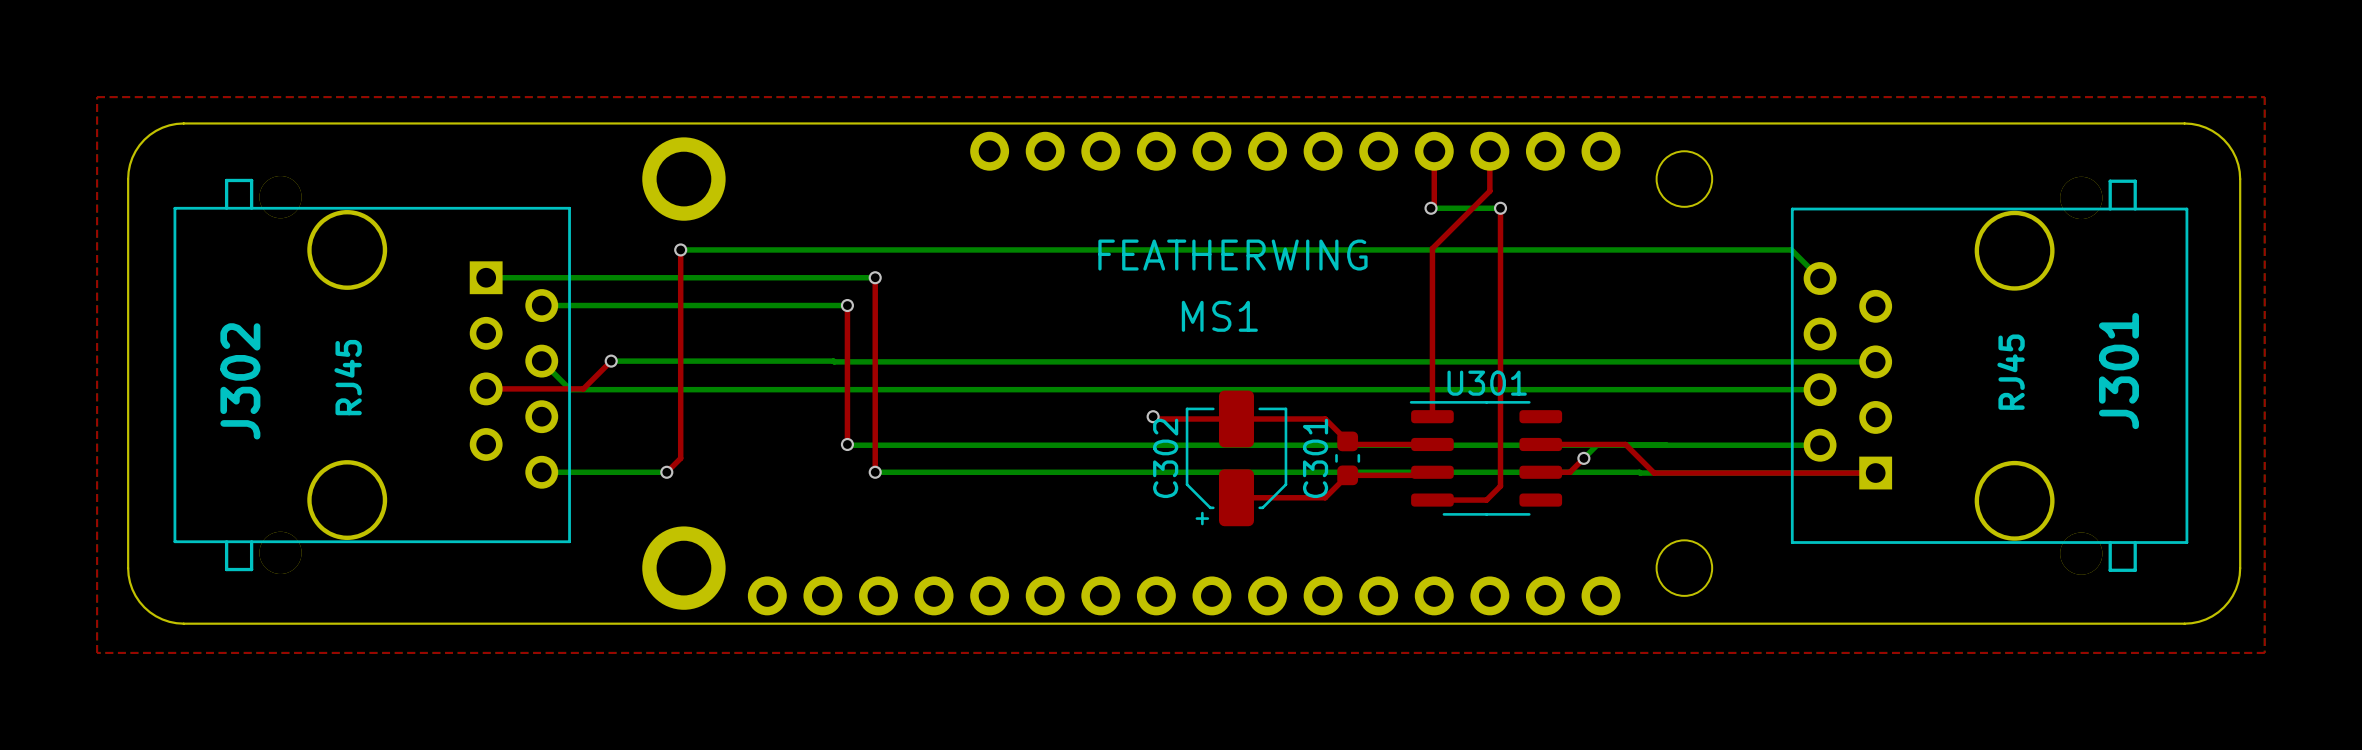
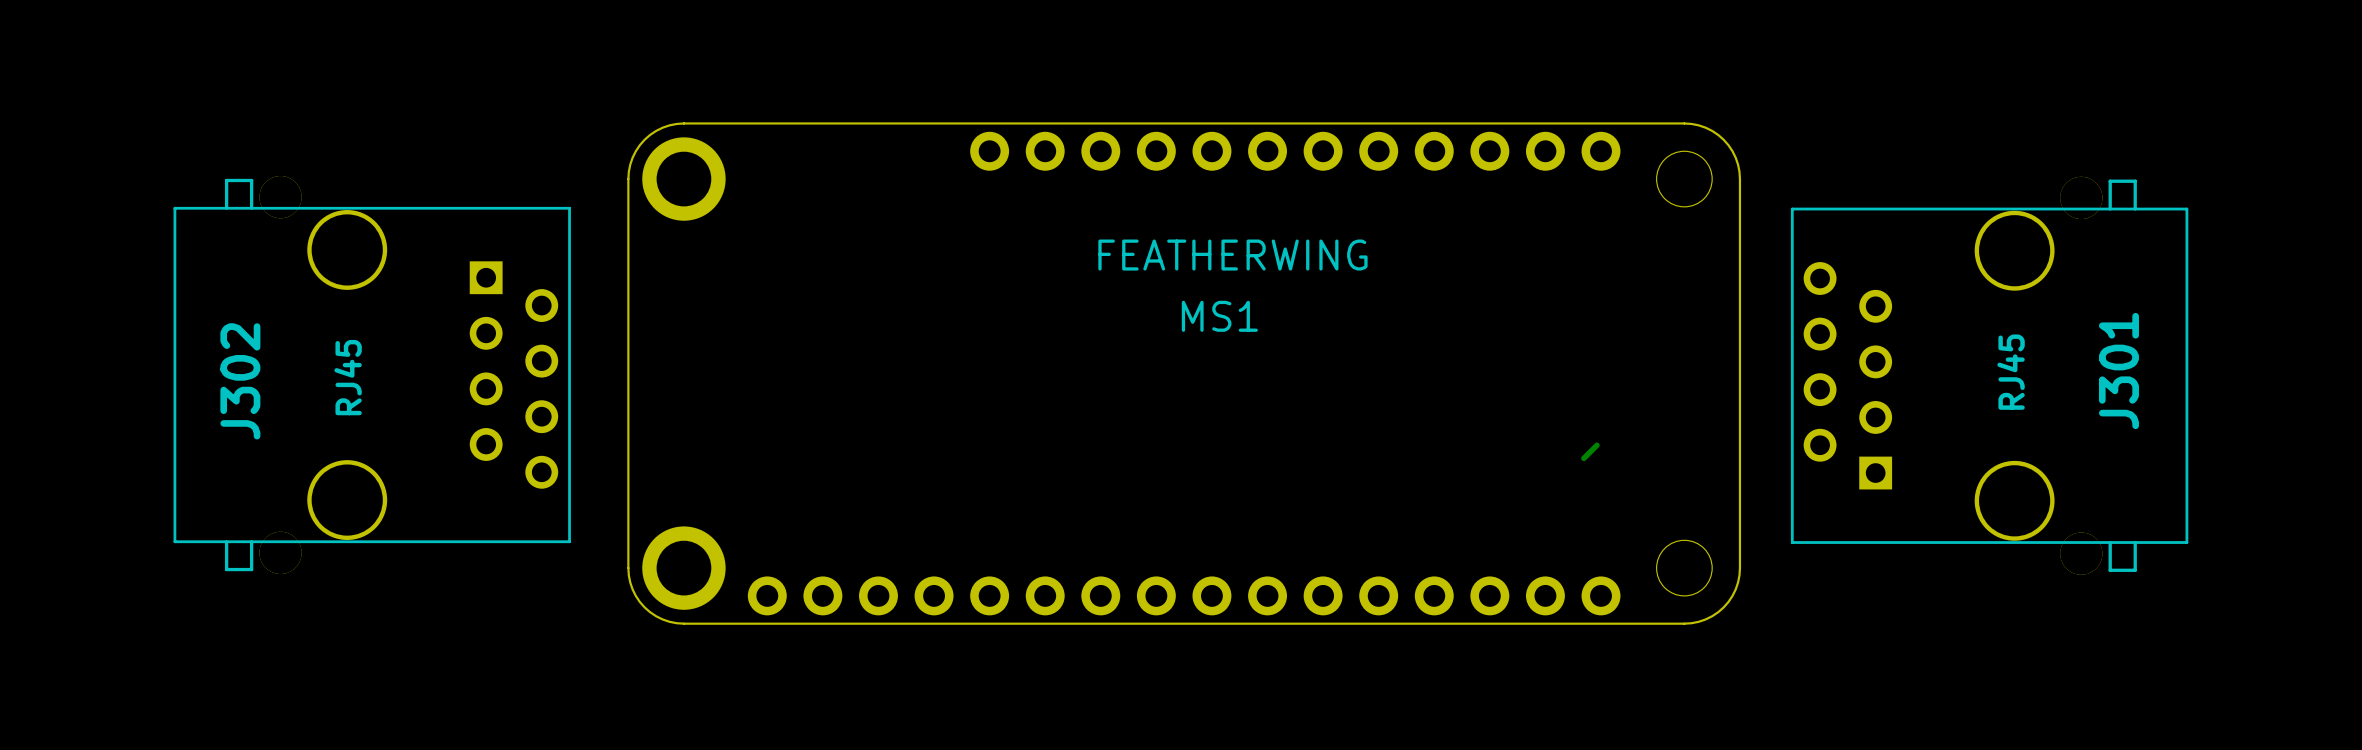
top zone outline: (97, 97) (97, 652) (2264, 652) (2264, 97) (97, 97) -> none
MS1 footprint: [127, 122, 2242, 625] -> [627, 122, 1742, 625]
top track: (1434, 151) (1434, 205) (1431, 208) -> none
top track: (1489, 151) (1489, 191) (1432, 248) (1432, 416) -> none
bottom track: (1431, 208) (1500, 208) -> none
via: (1431, 208) -> none
top track: (1500, 208) (1500, 486) (1486, 500) (1432, 500) -> none
via: (1500, 208) -> none
top track: (680, 249) (680, 458) (666, 472) -> none
bottom track: (680, 249) (1791, 249) (1820, 278) -> none
via: (680, 249) -> none
bottom track: (486, 277) (875, 277) -> none
top track: (875, 277) (875, 472) -> none
via: (875, 277) -> none
bottom track: (541, 305) (847, 305) -> none
top track: (847, 305) (847, 444) -> none
via: (847, 305) -> none
bottom track: (541, 361) (570, 389) (1820, 389) -> none
top track: (611, 361) (583, 388) (486, 388) -> none
bottom track: (611, 361) (1875, 361) -> none
via: (611, 361) -> none
top track: (1153, 416) (1155, 418) (1325, 418) (1350, 444) (1432, 444) -> none
via: (1153, 416) -> none
bottom track: (847, 444) (1820, 445) -> none
via: (847, 444) -> none
top track: (1540, 444) (1625, 444) (1654, 473) (1875, 473) -> none
C302: (1236, 458) -> none
C301: (1347, 458) -> none
U301: (1485, 458) -> none
top track: (1583, 458) (1569, 472) (1540, 472) -> none
via: (1583, 458) -> none
bottom track: (541, 472) (666, 472) -> none
via: (666, 472) -> none
bottom track: (875, 472) (1875, 473) -> none
via: (875, 472) -> none
top track: (1432, 472) (1429, 475) (1347, 475) (1325, 497) (1236, 497) -> none

